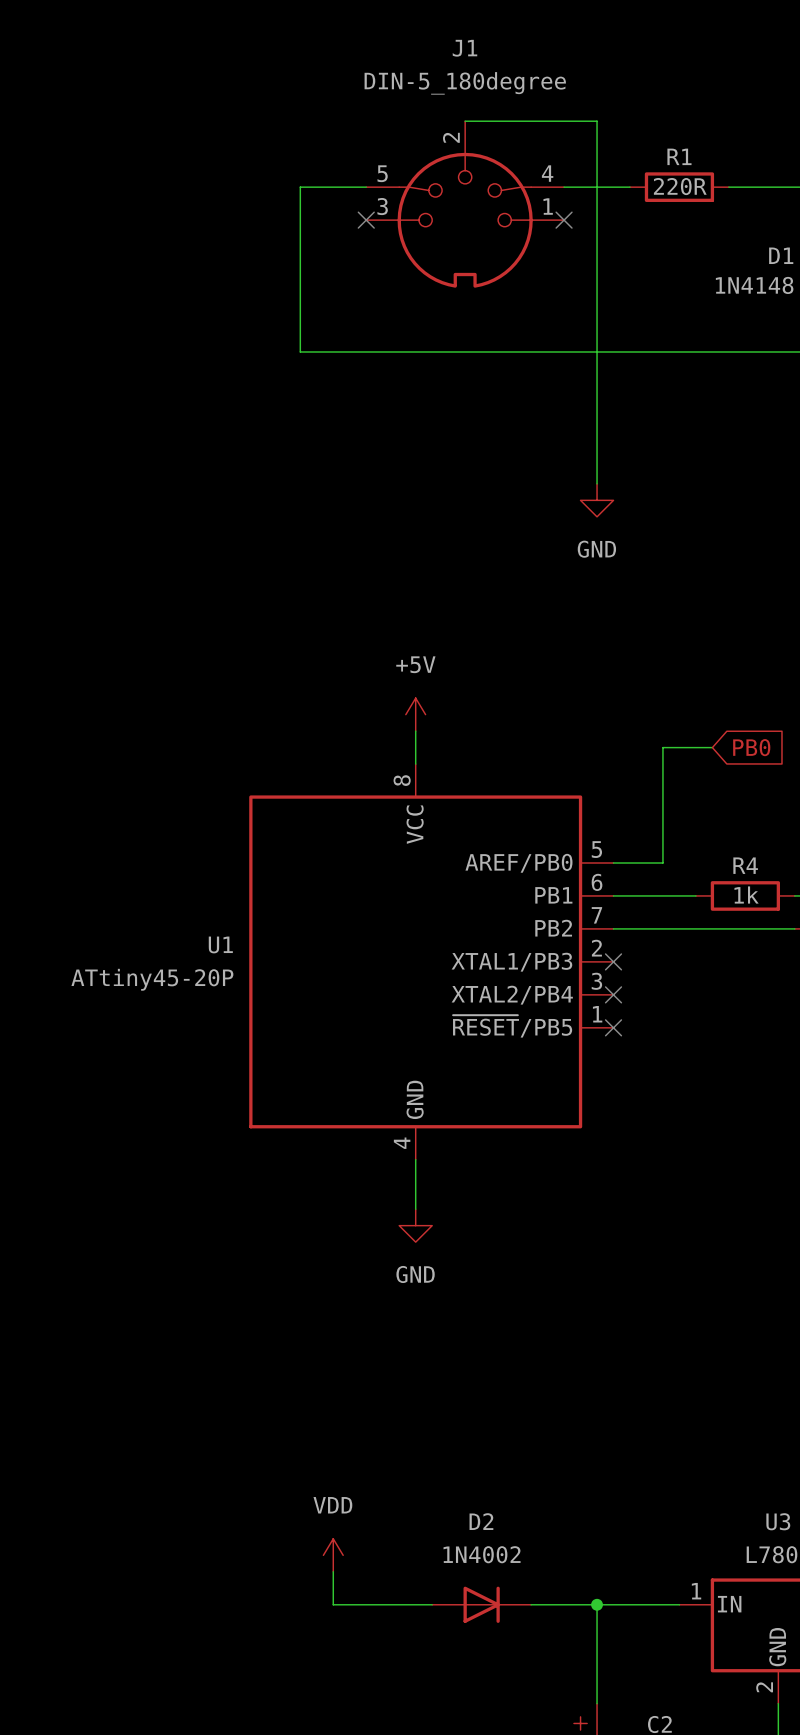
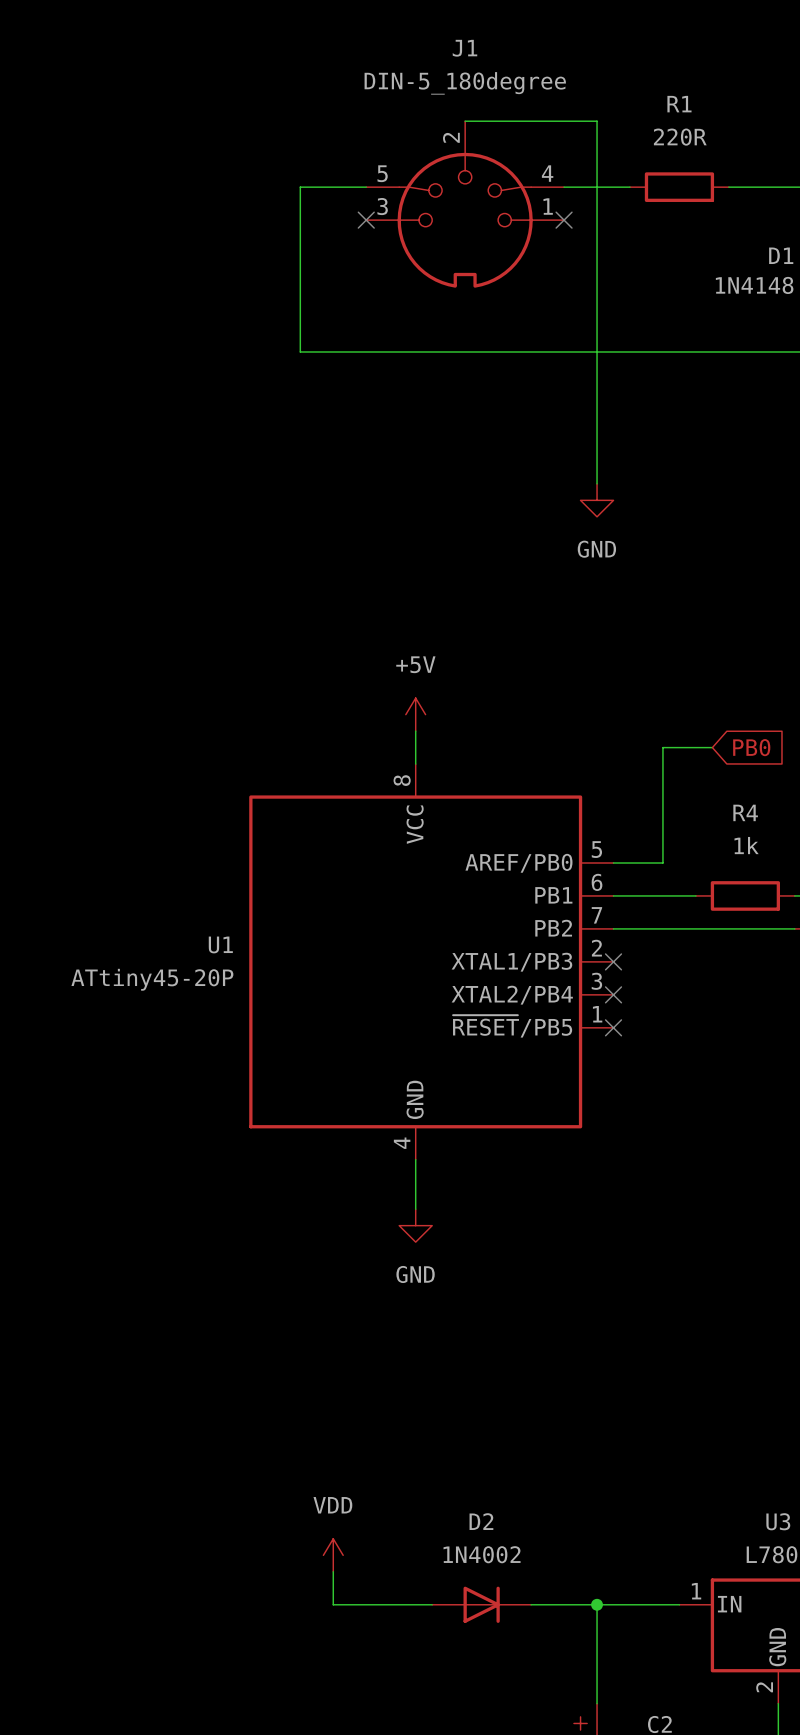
R1 name position: R1 (679, 156) -> R1 (679, 104)
R1 value position: 220R (680, 186) -> 220R (680, 137)
R4 name position: R4 (745, 865) -> R4 (745, 812)
R4 value position: 1k (746, 895) -> 1k (746, 845)

